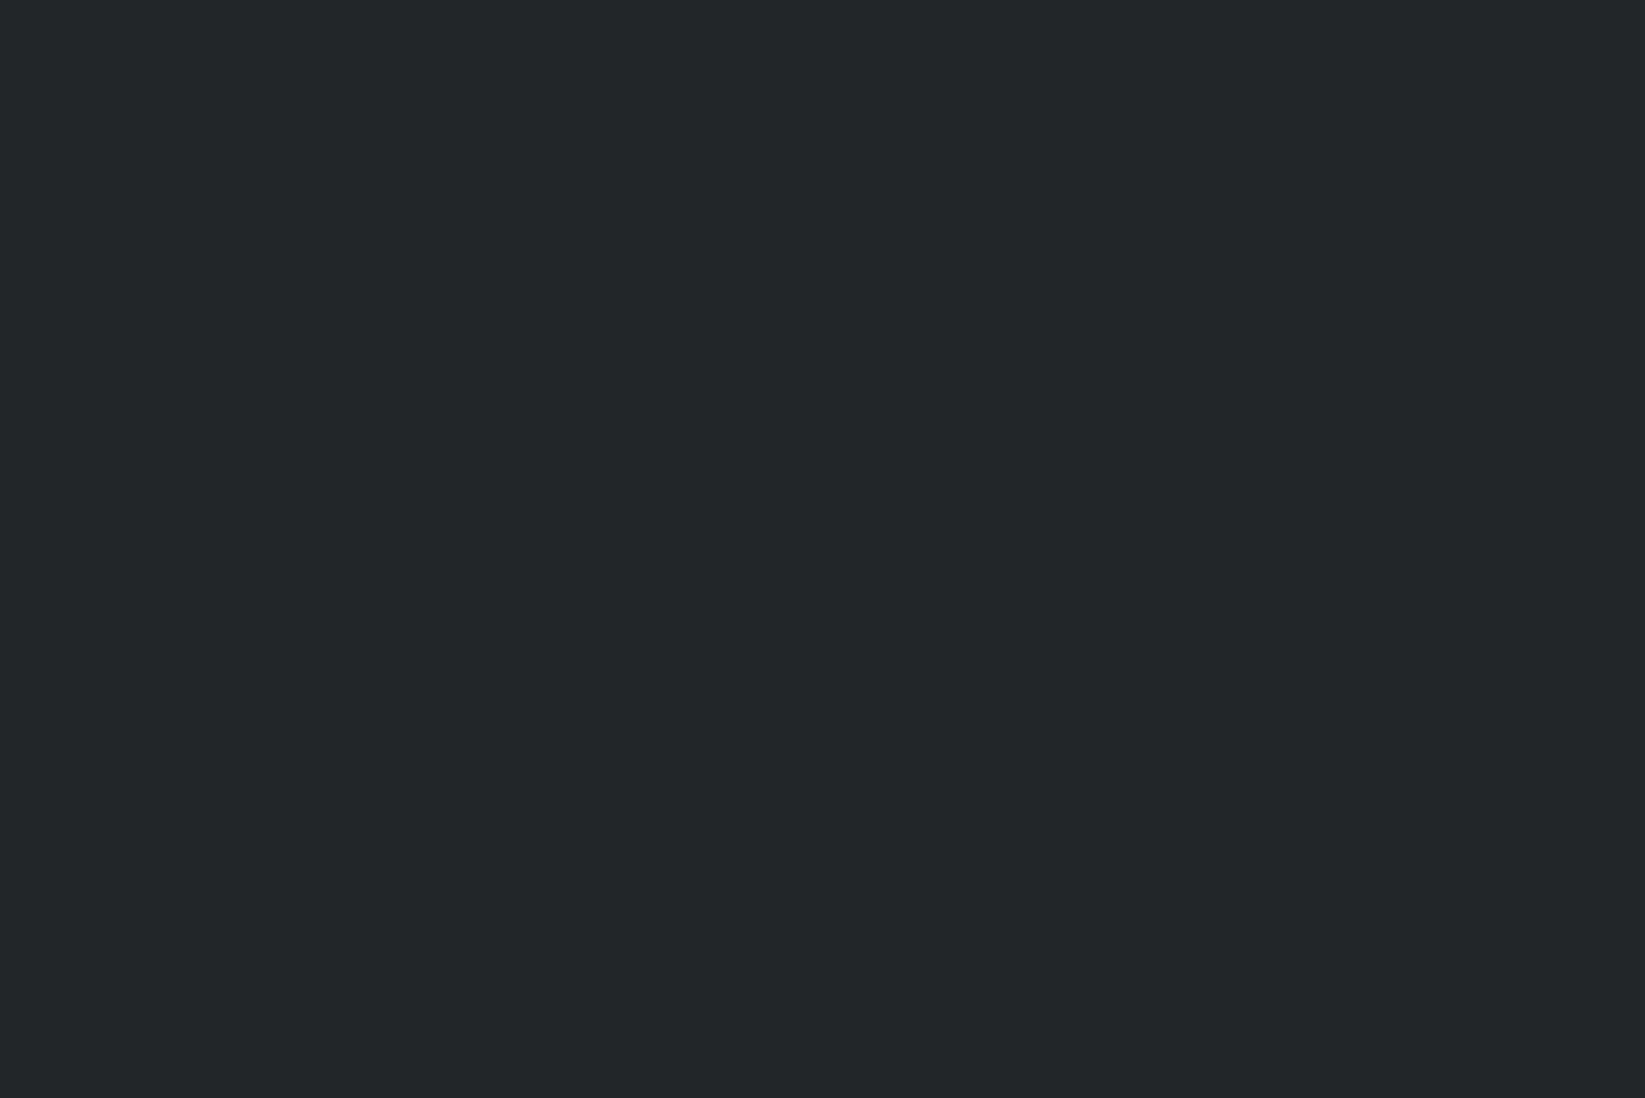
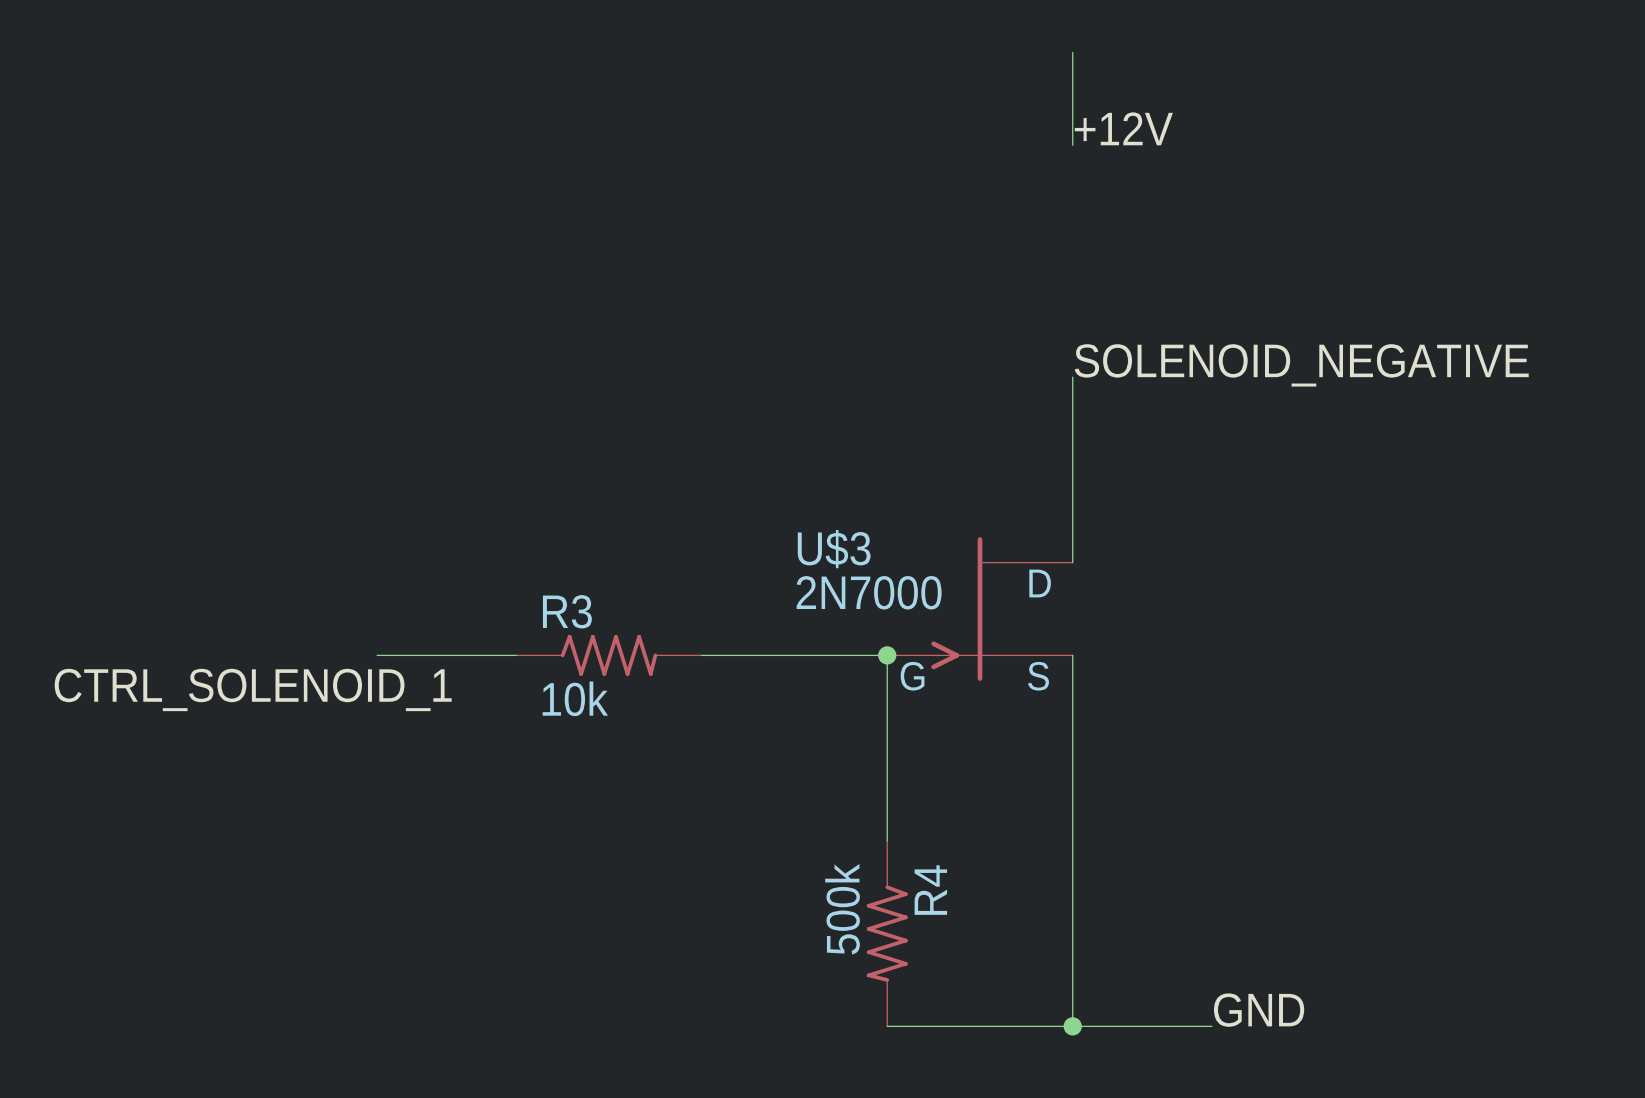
wire: none -> (1072, 52) (1072, 145)
label: none -> +12V (1123, 128)
label: none -> SOLENOID_NEGATIVE (1301, 365)
wire: none -> (1072, 377) (1072, 562)
U$3: none -> 2N7000 (979, 609)
wire: none -> (377, 655) (516, 655)
R3: none -> 10k (609, 655)
wire: none -> (701, 655) (887, 655) (887, 840)
junction: none -> (887, 655)
wire: none -> (1072, 655) (1072, 1026)
label: none -> CTRL_SOLENOID_1 (253, 689)
R4: none -> 500k (887, 933)
label: none -> GND (1259, 1010)
wire: none -> (887, 1026) (1211, 1026)
junction: none -> (1072, 1026)

